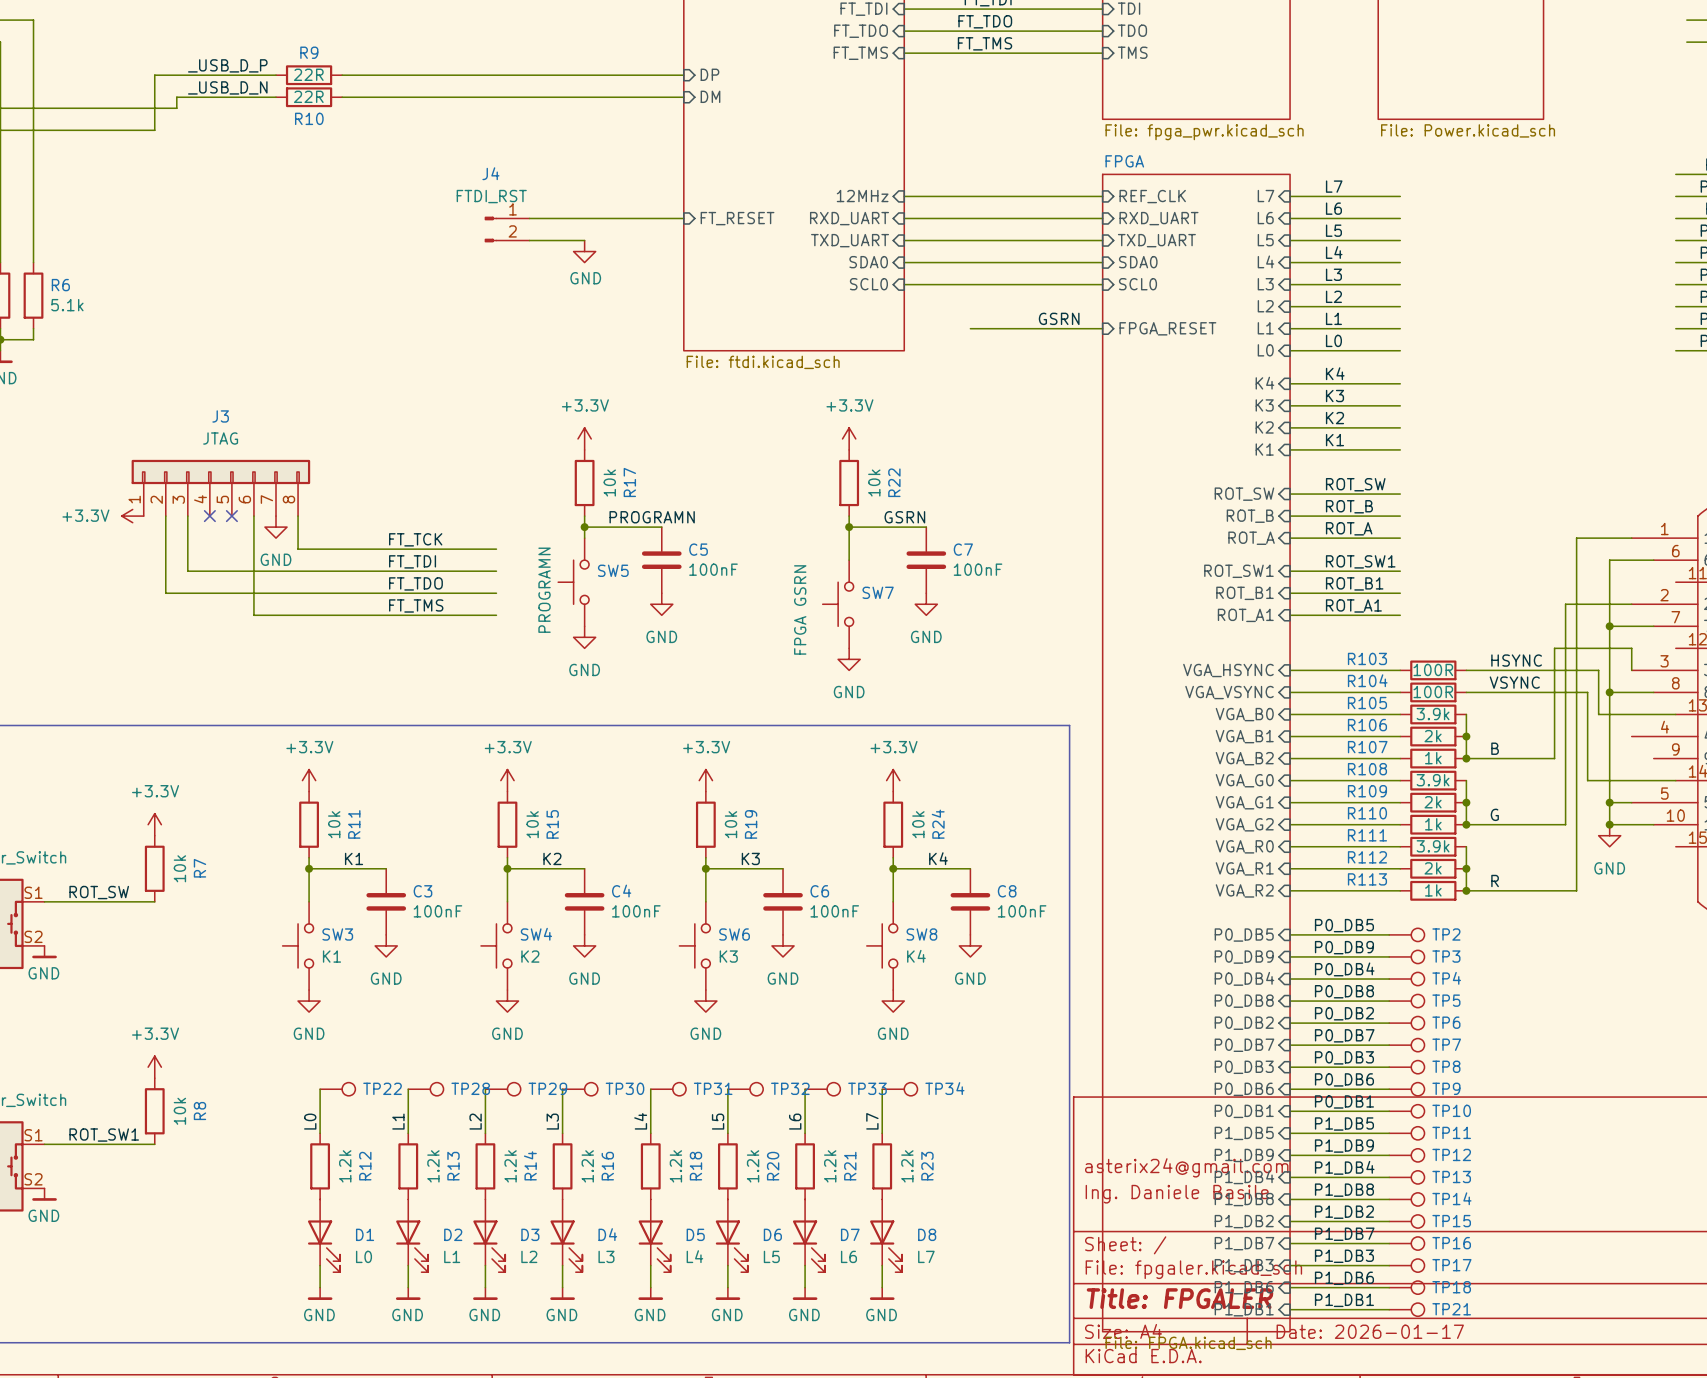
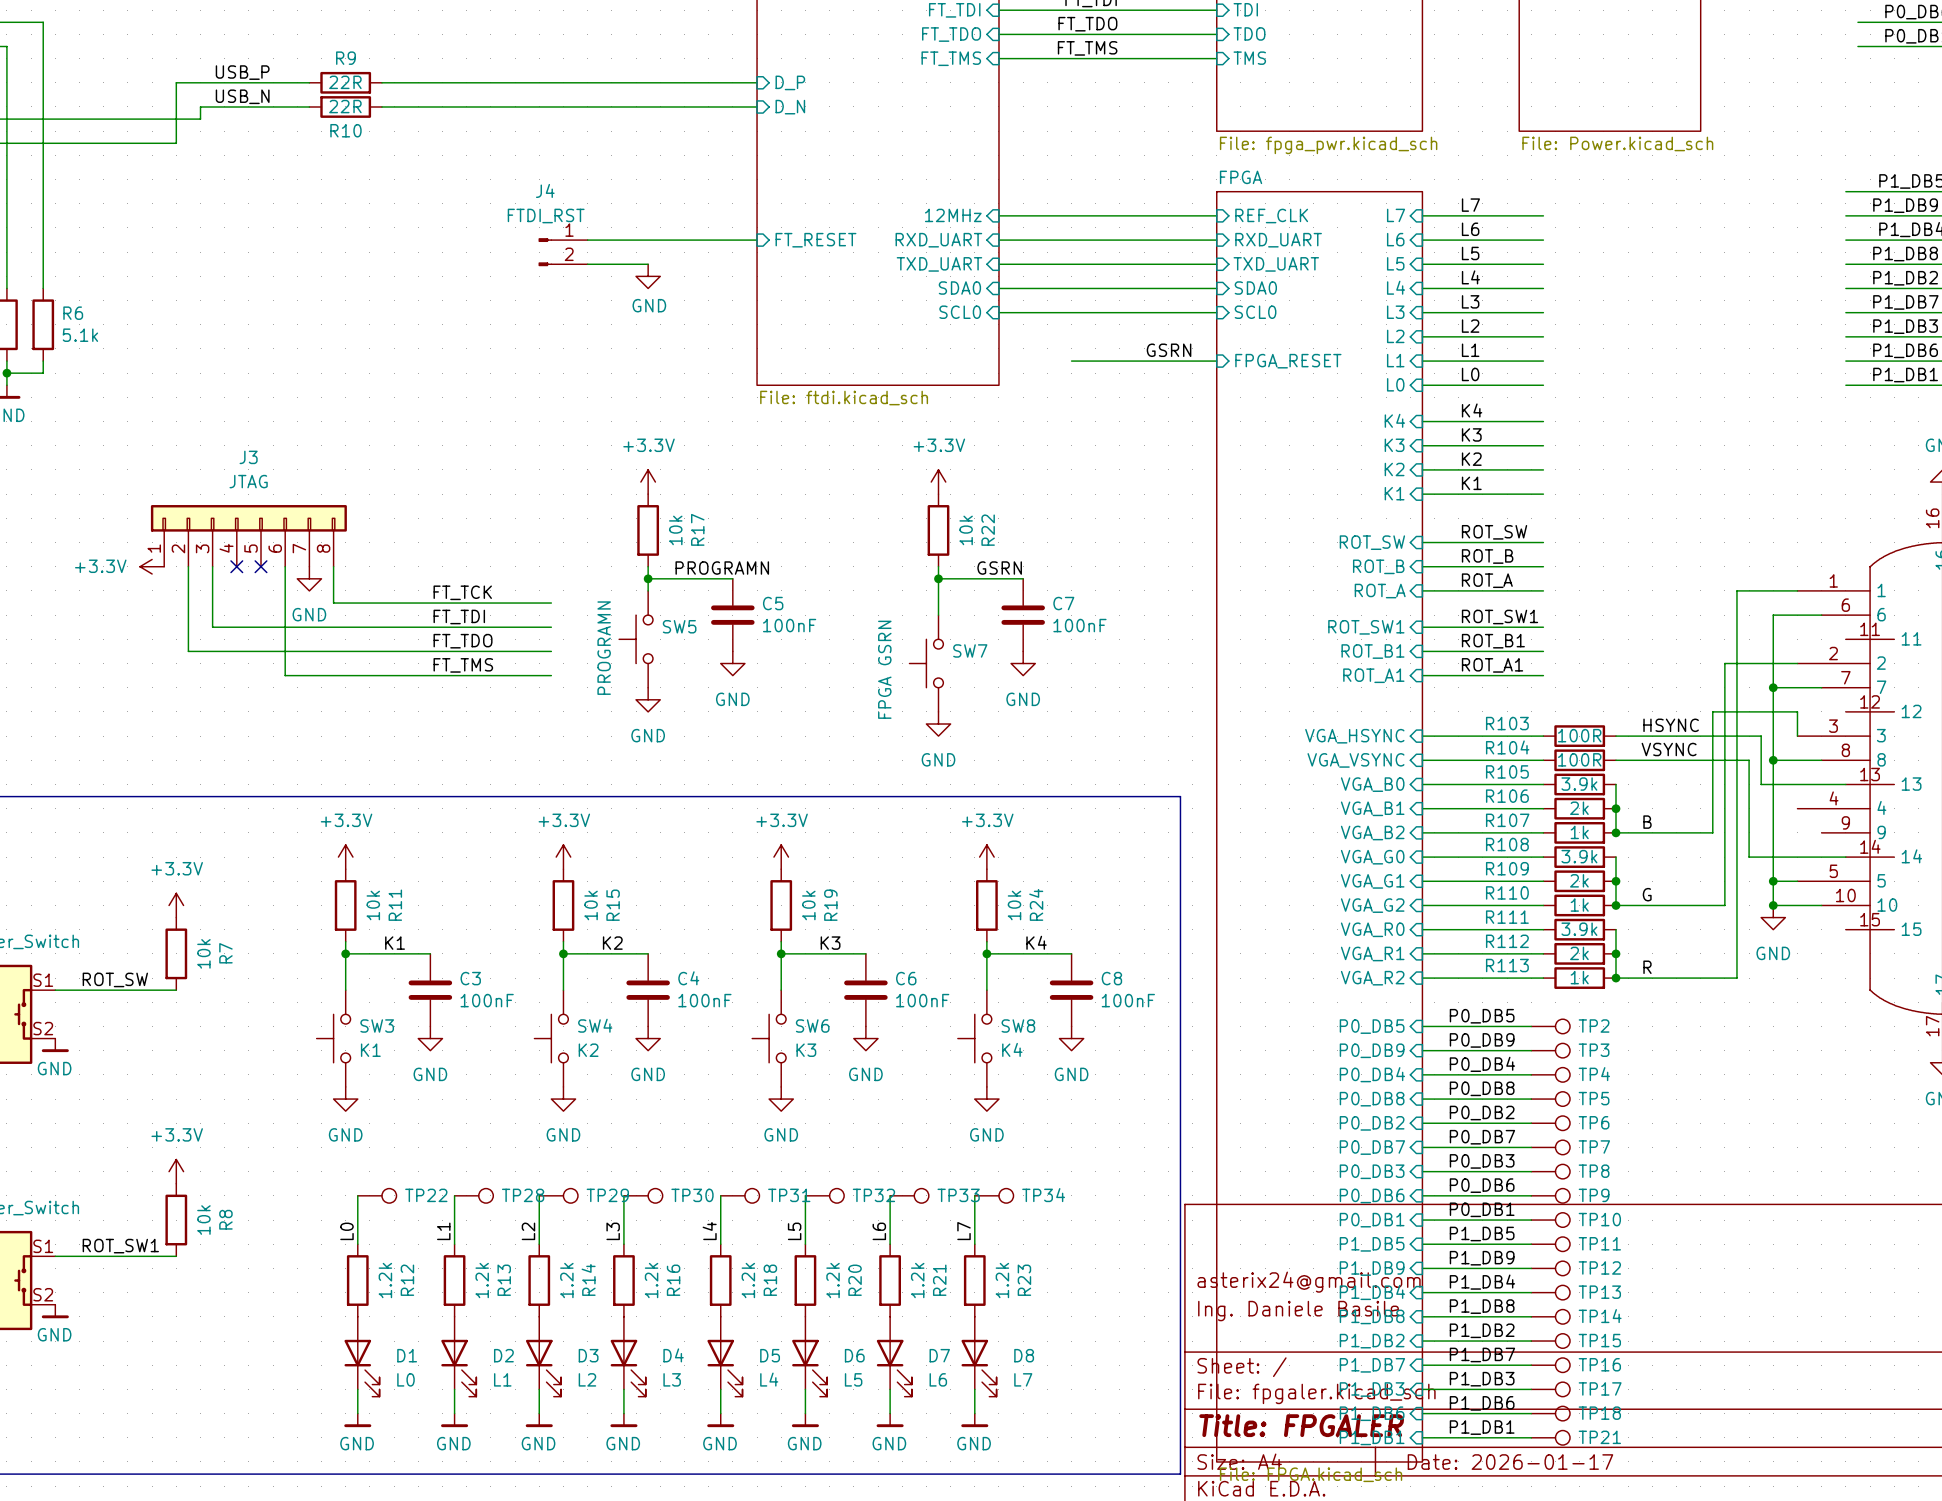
label: _USB_D_P (227, 65) -> USB_P (242, 72)
sheet pin: DP (709, 74) -> D_P (790, 82)
label: _USB_D_N (227, 87) -> USB_N (242, 96)
sheet pin: DM (710, 96) -> D_N (790, 107)

